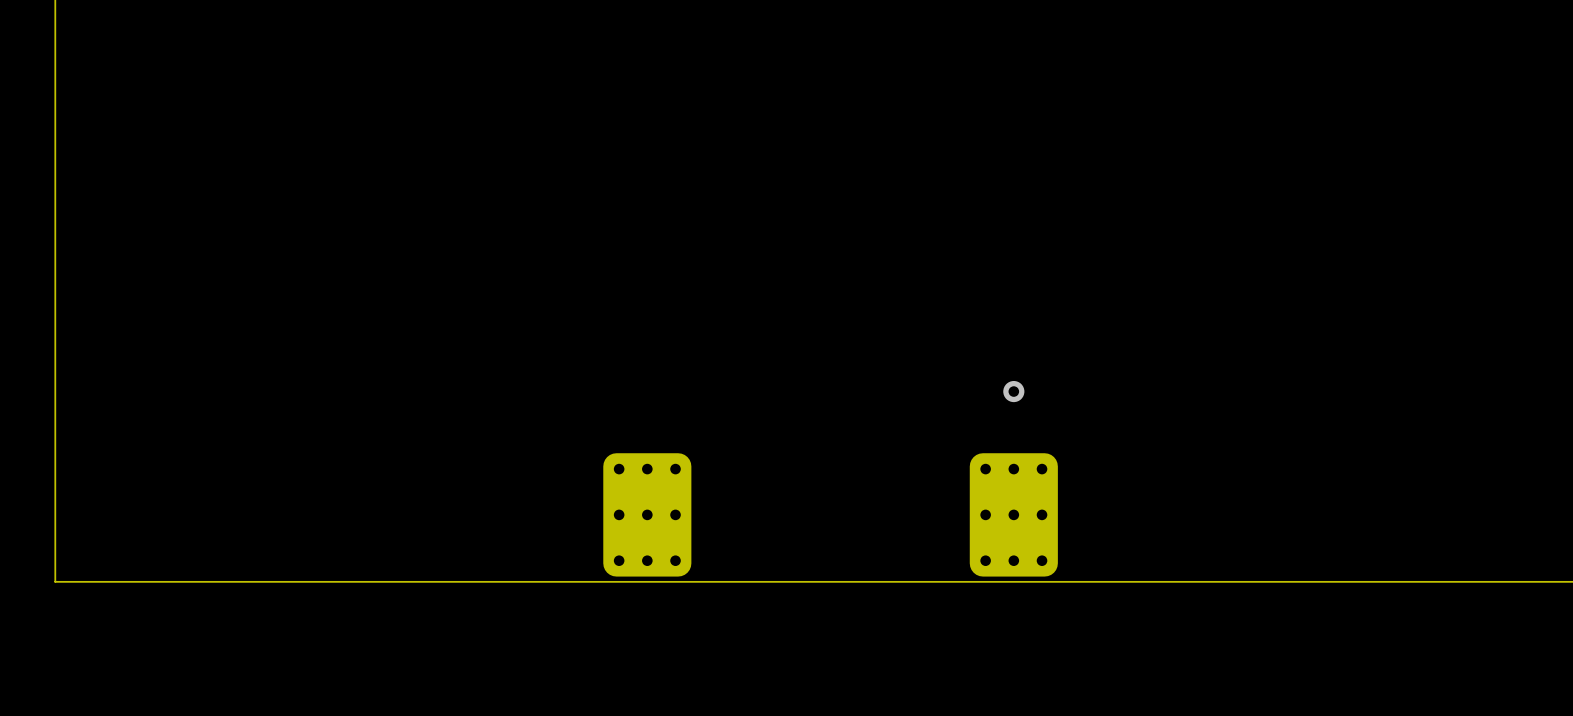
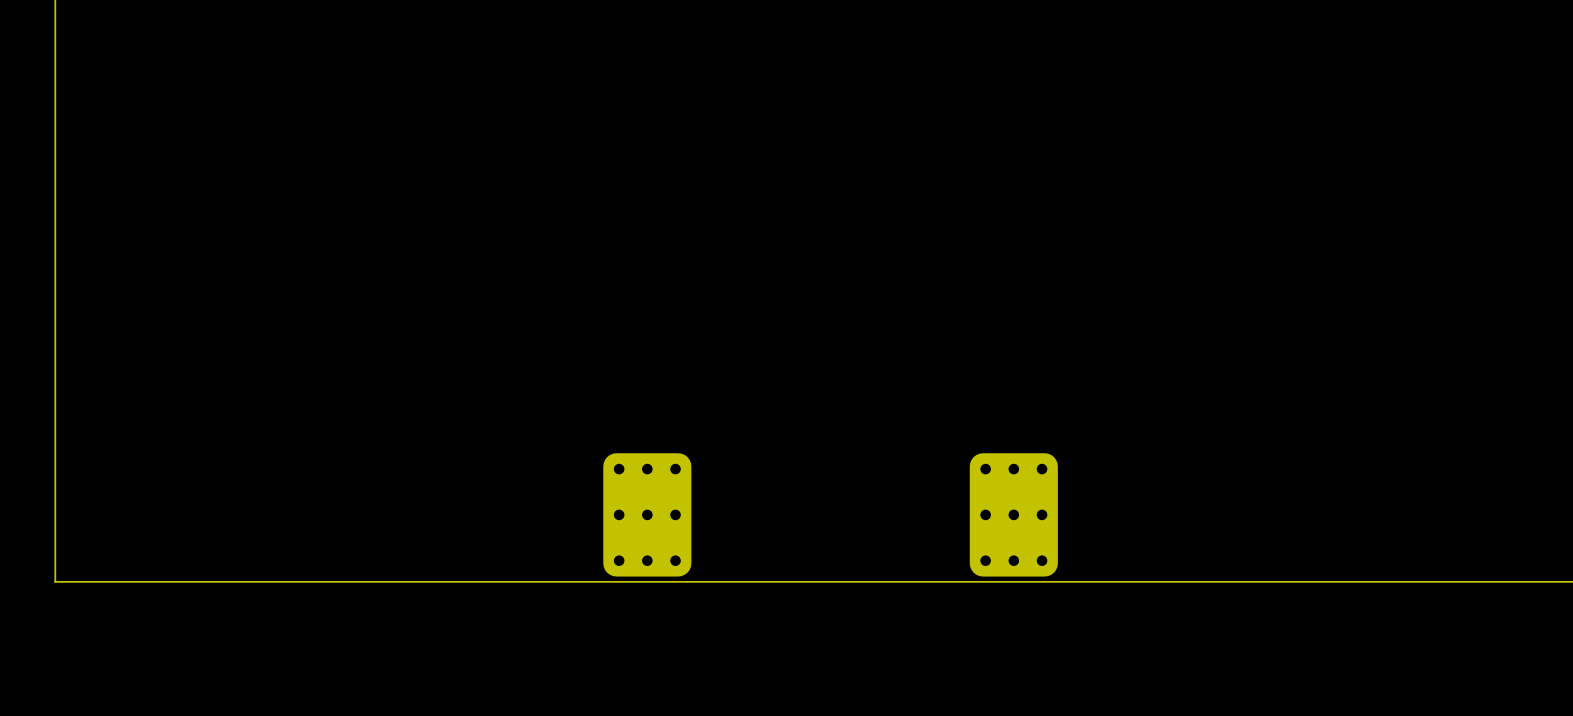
via: (1013, 391) -> none

